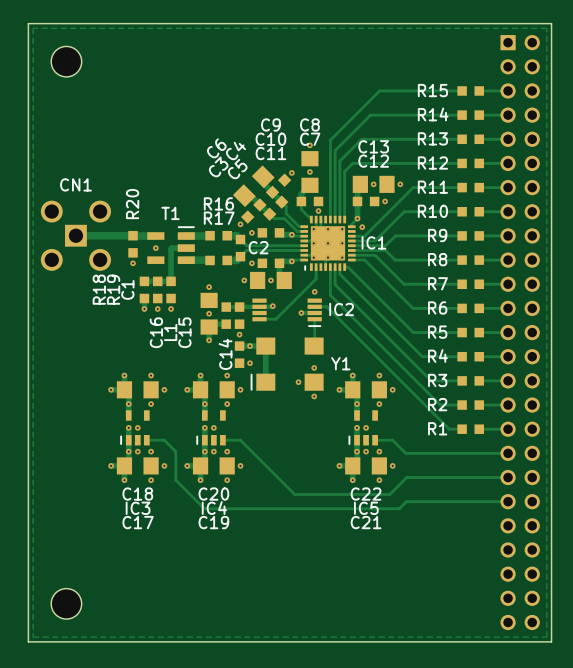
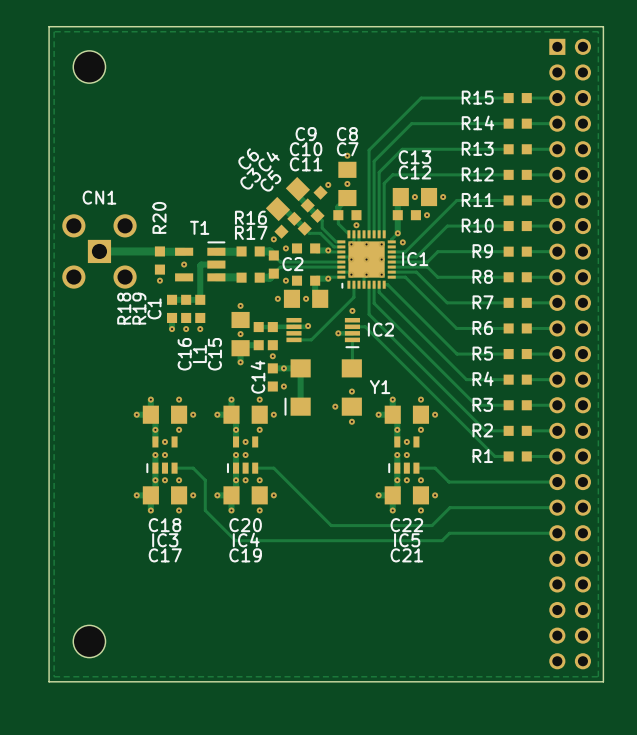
via: none -> (164, 441)
via: none -> (245, 441)
via: none -> (406, 441)

